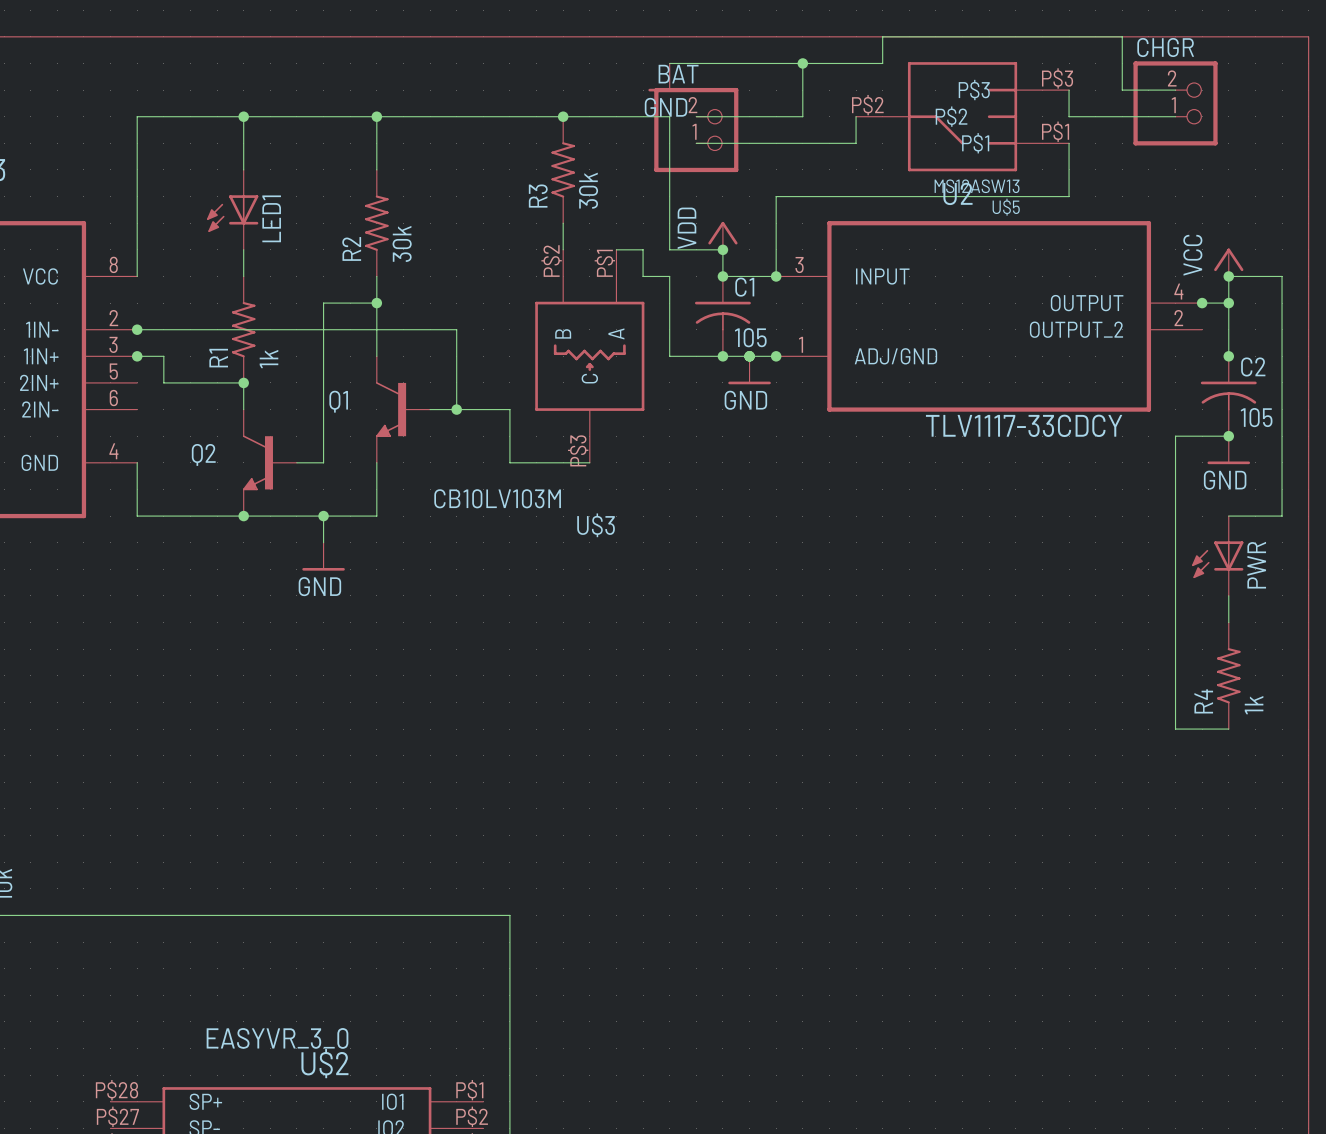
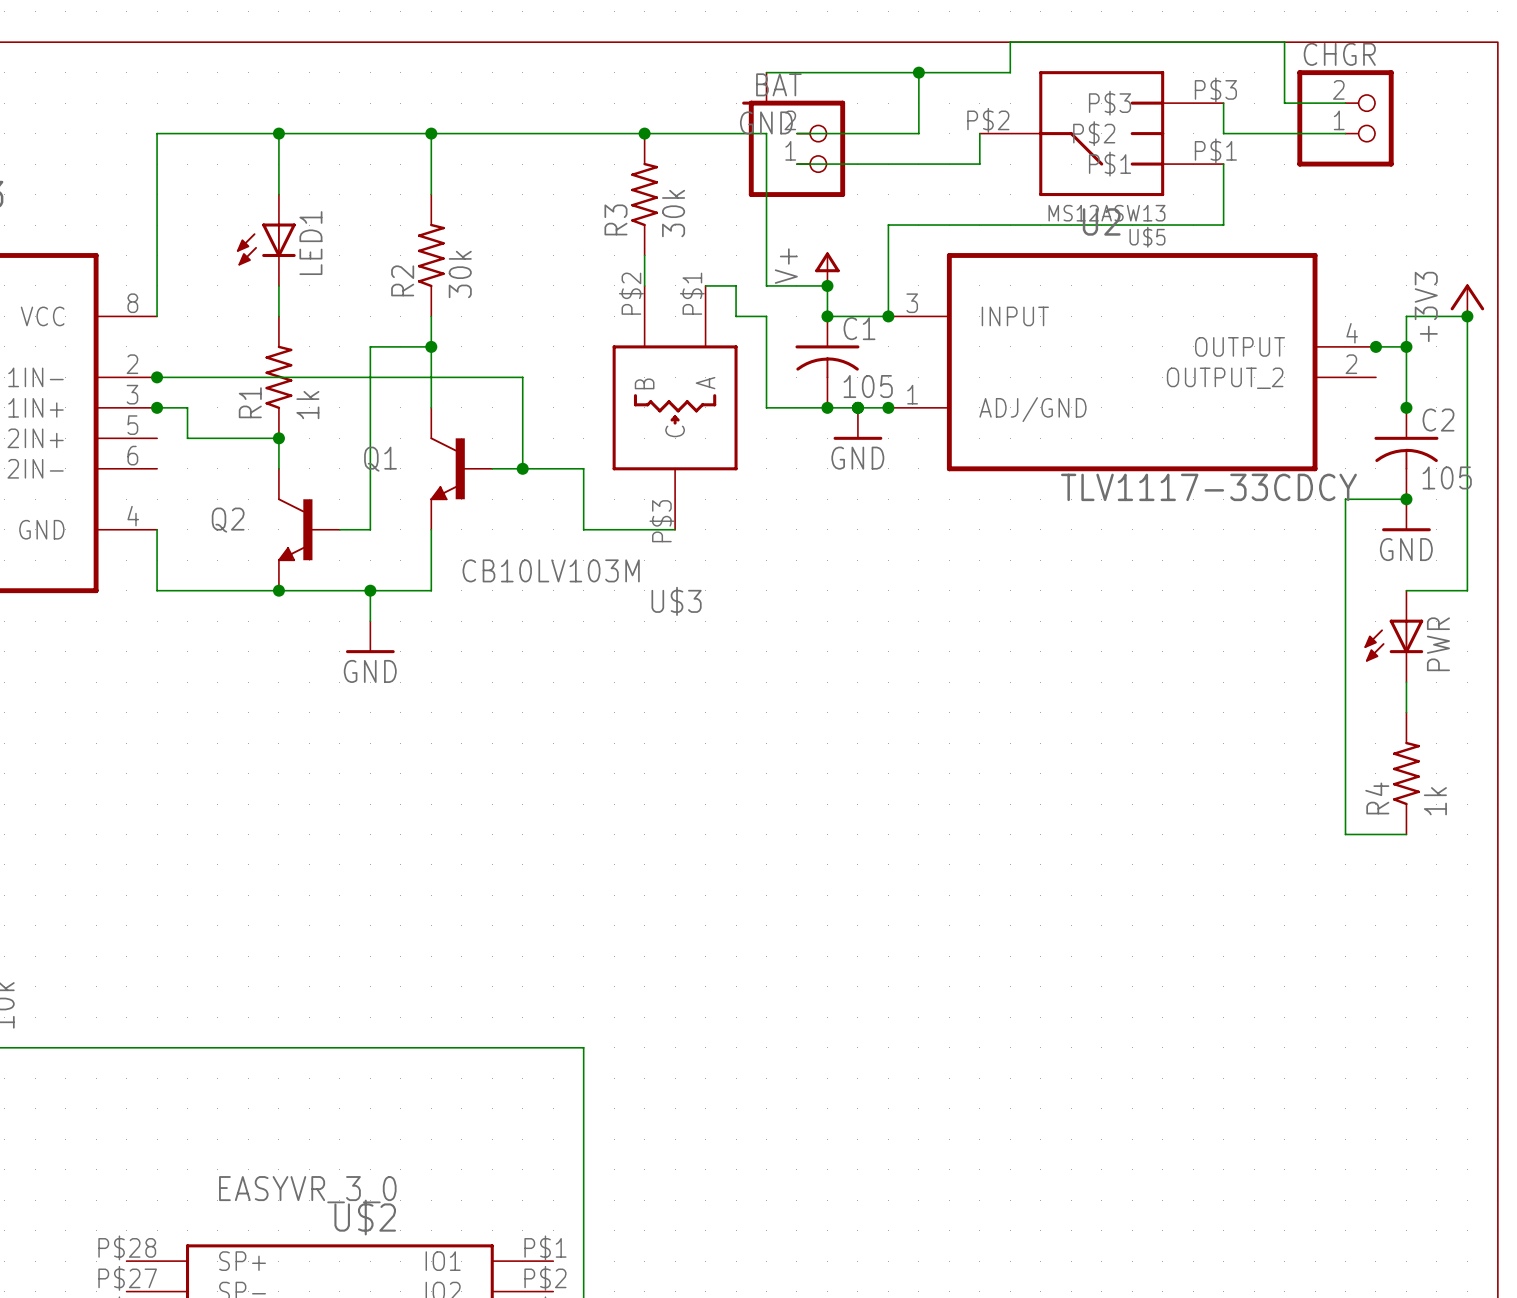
power symbol: VDD (722, 235) -> V+ (827, 269)
power symbol: VCC (1228, 262) -> none
power symbol: none -> +3V3 (1467, 300)
junction position: (1228, 276) -> (1467, 316)

